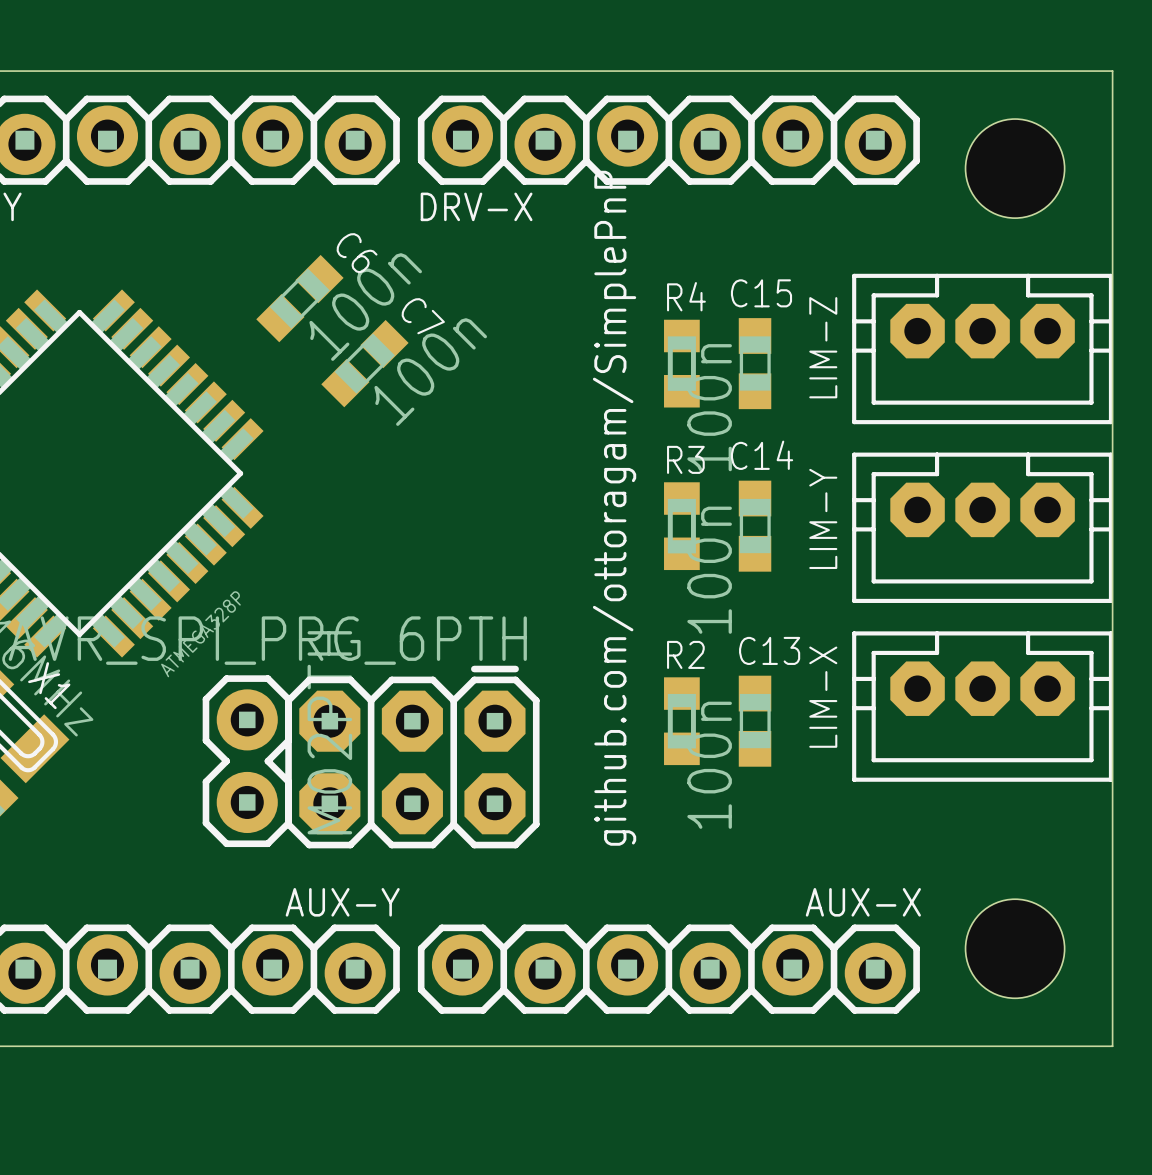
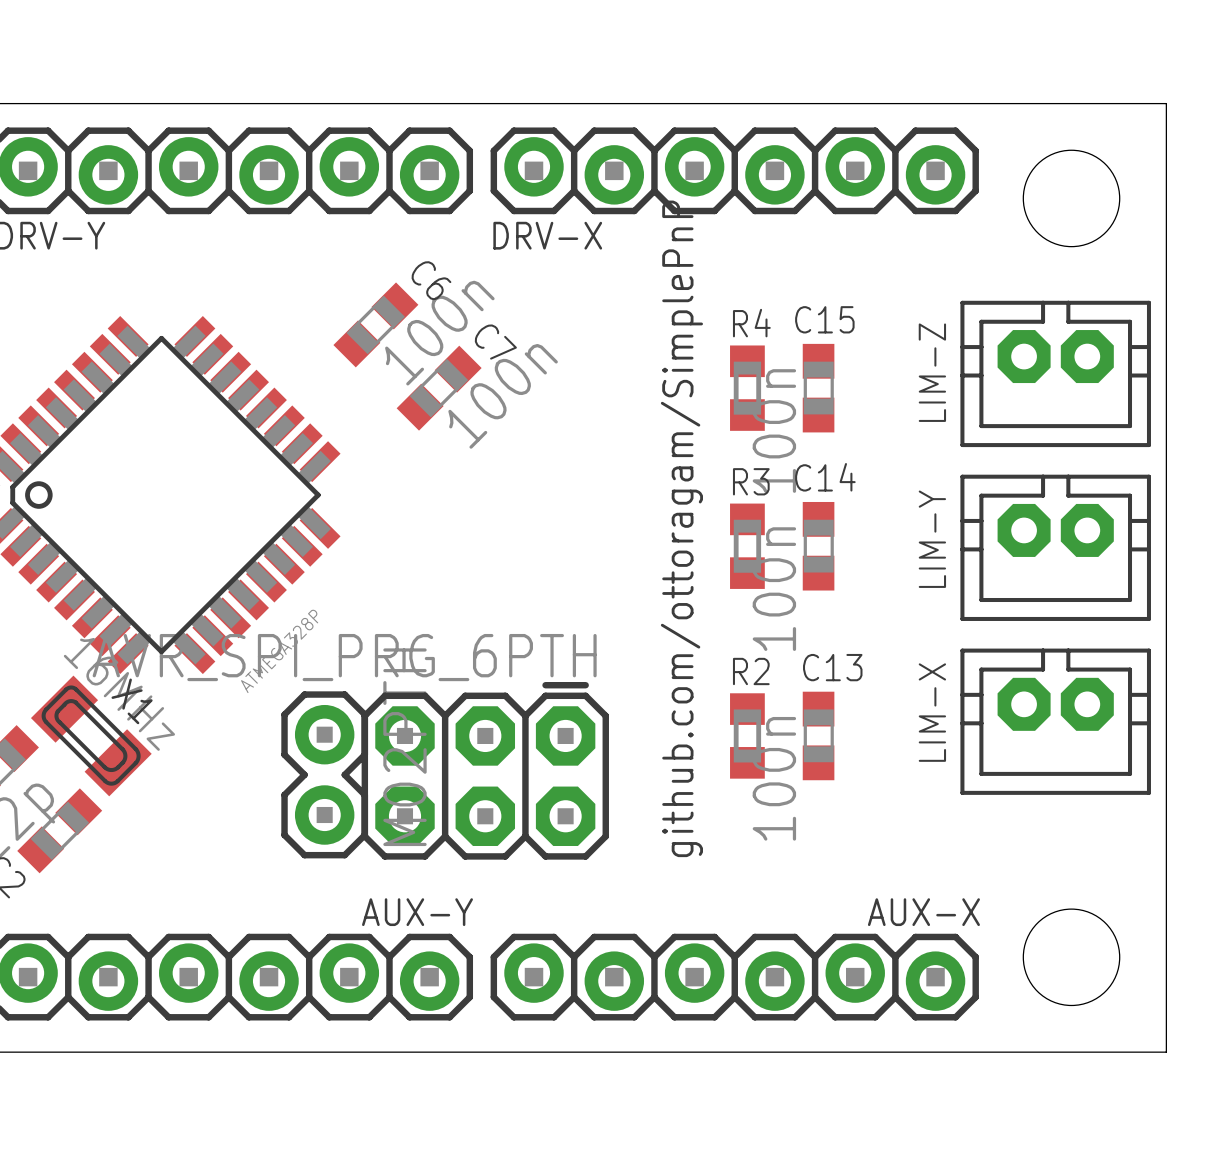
LIM-Z footprint: [852, 273, 1114, 425] -> [960, 300, 1151, 448]
LIM-Y footprint: [852, 452, 1114, 603] -> [960, 474, 1151, 621]
LIM-X footprint: [852, 631, 1114, 782] -> [960, 648, 1151, 795]

